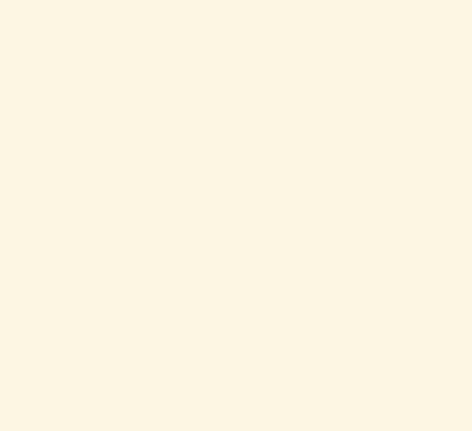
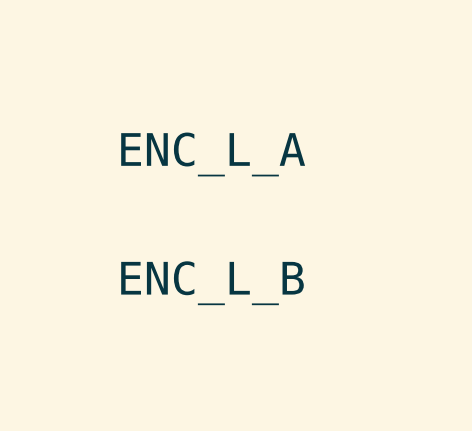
label: none -> ENC_L_A (213, 154)
label: none -> ENC_L_B (212, 283)

